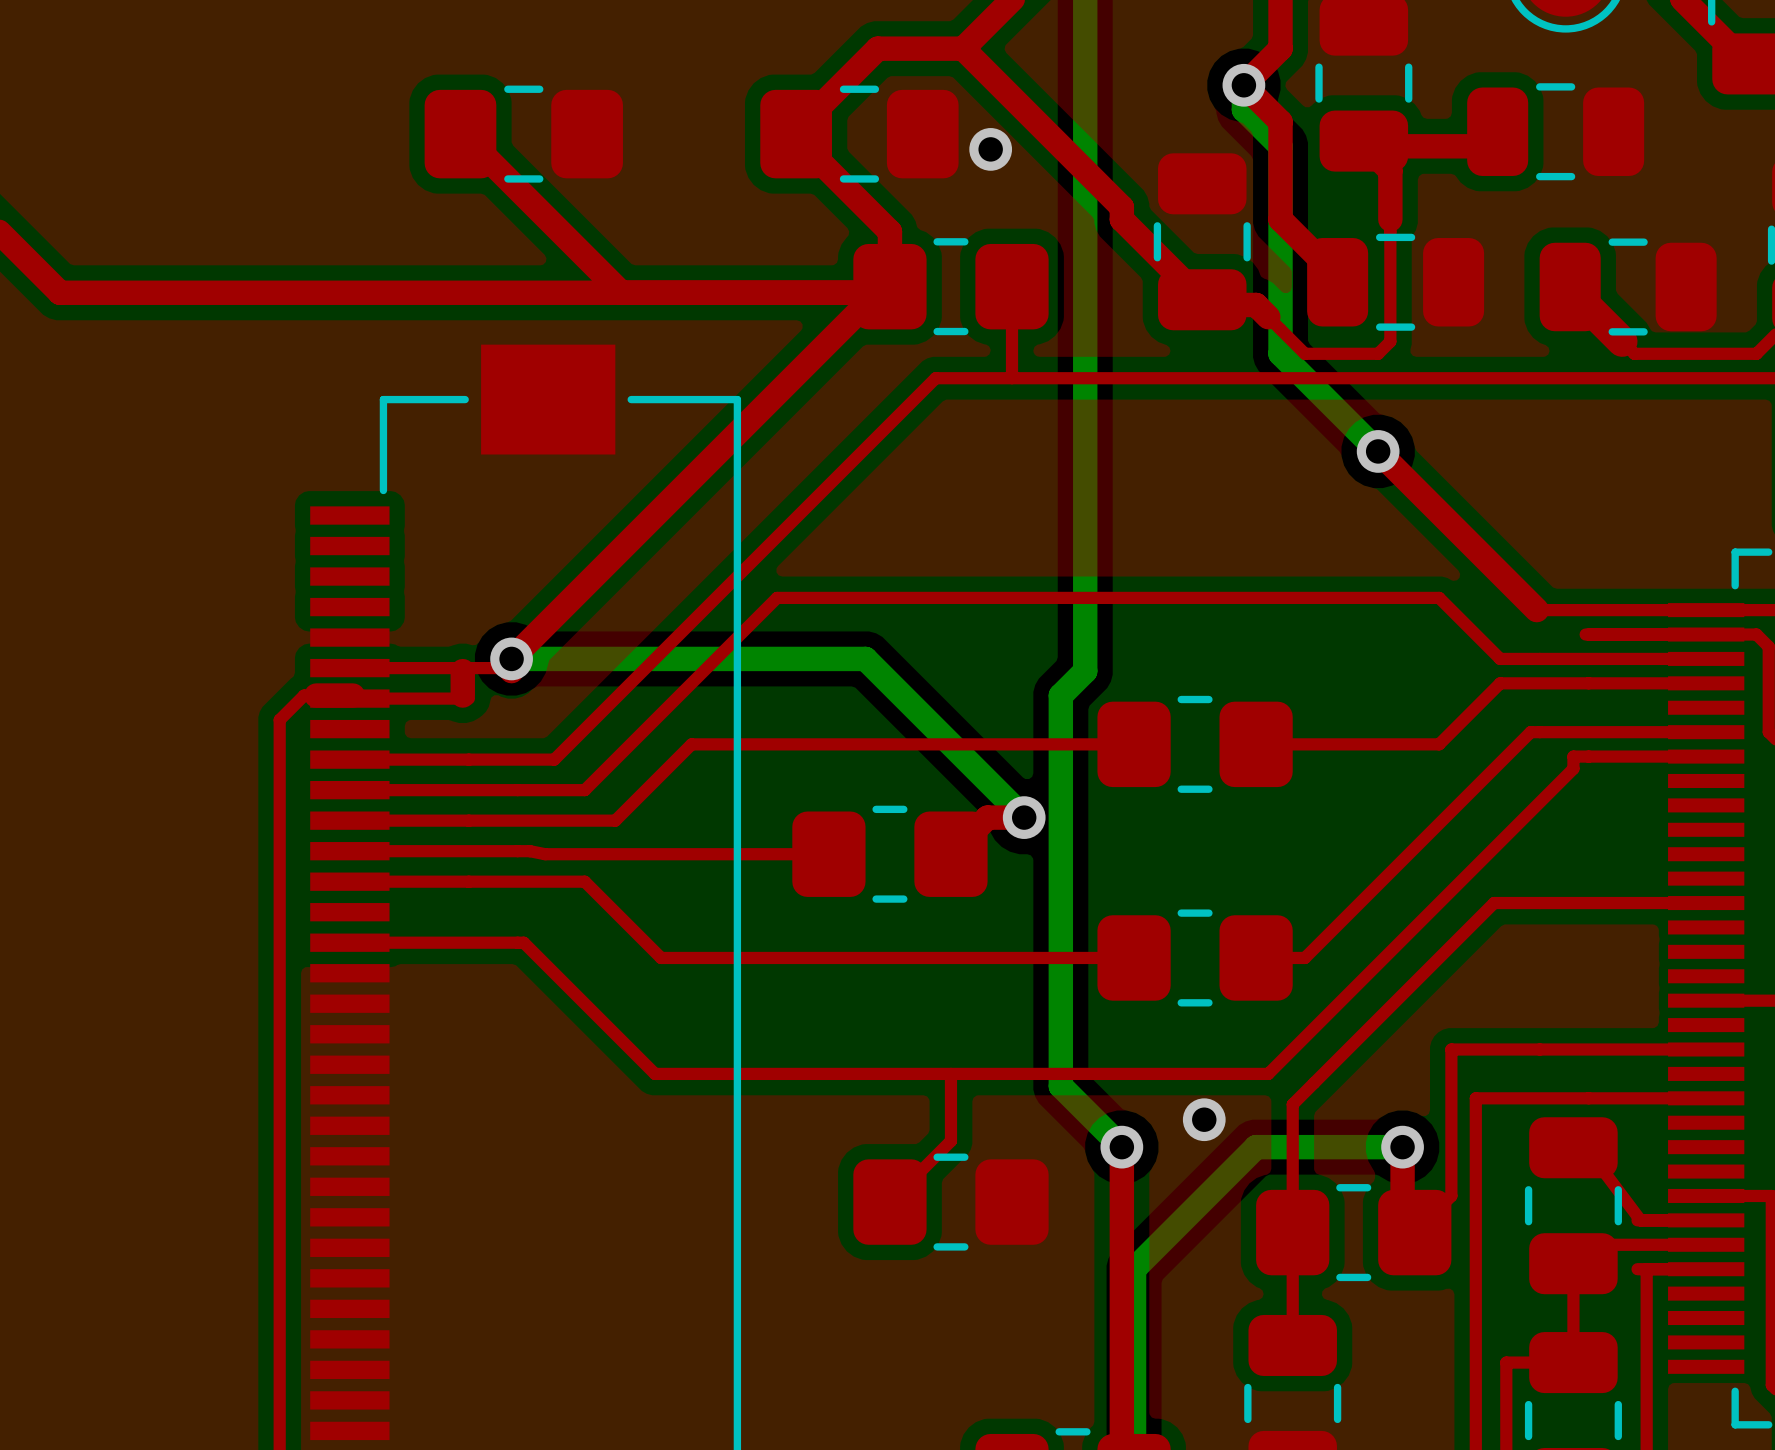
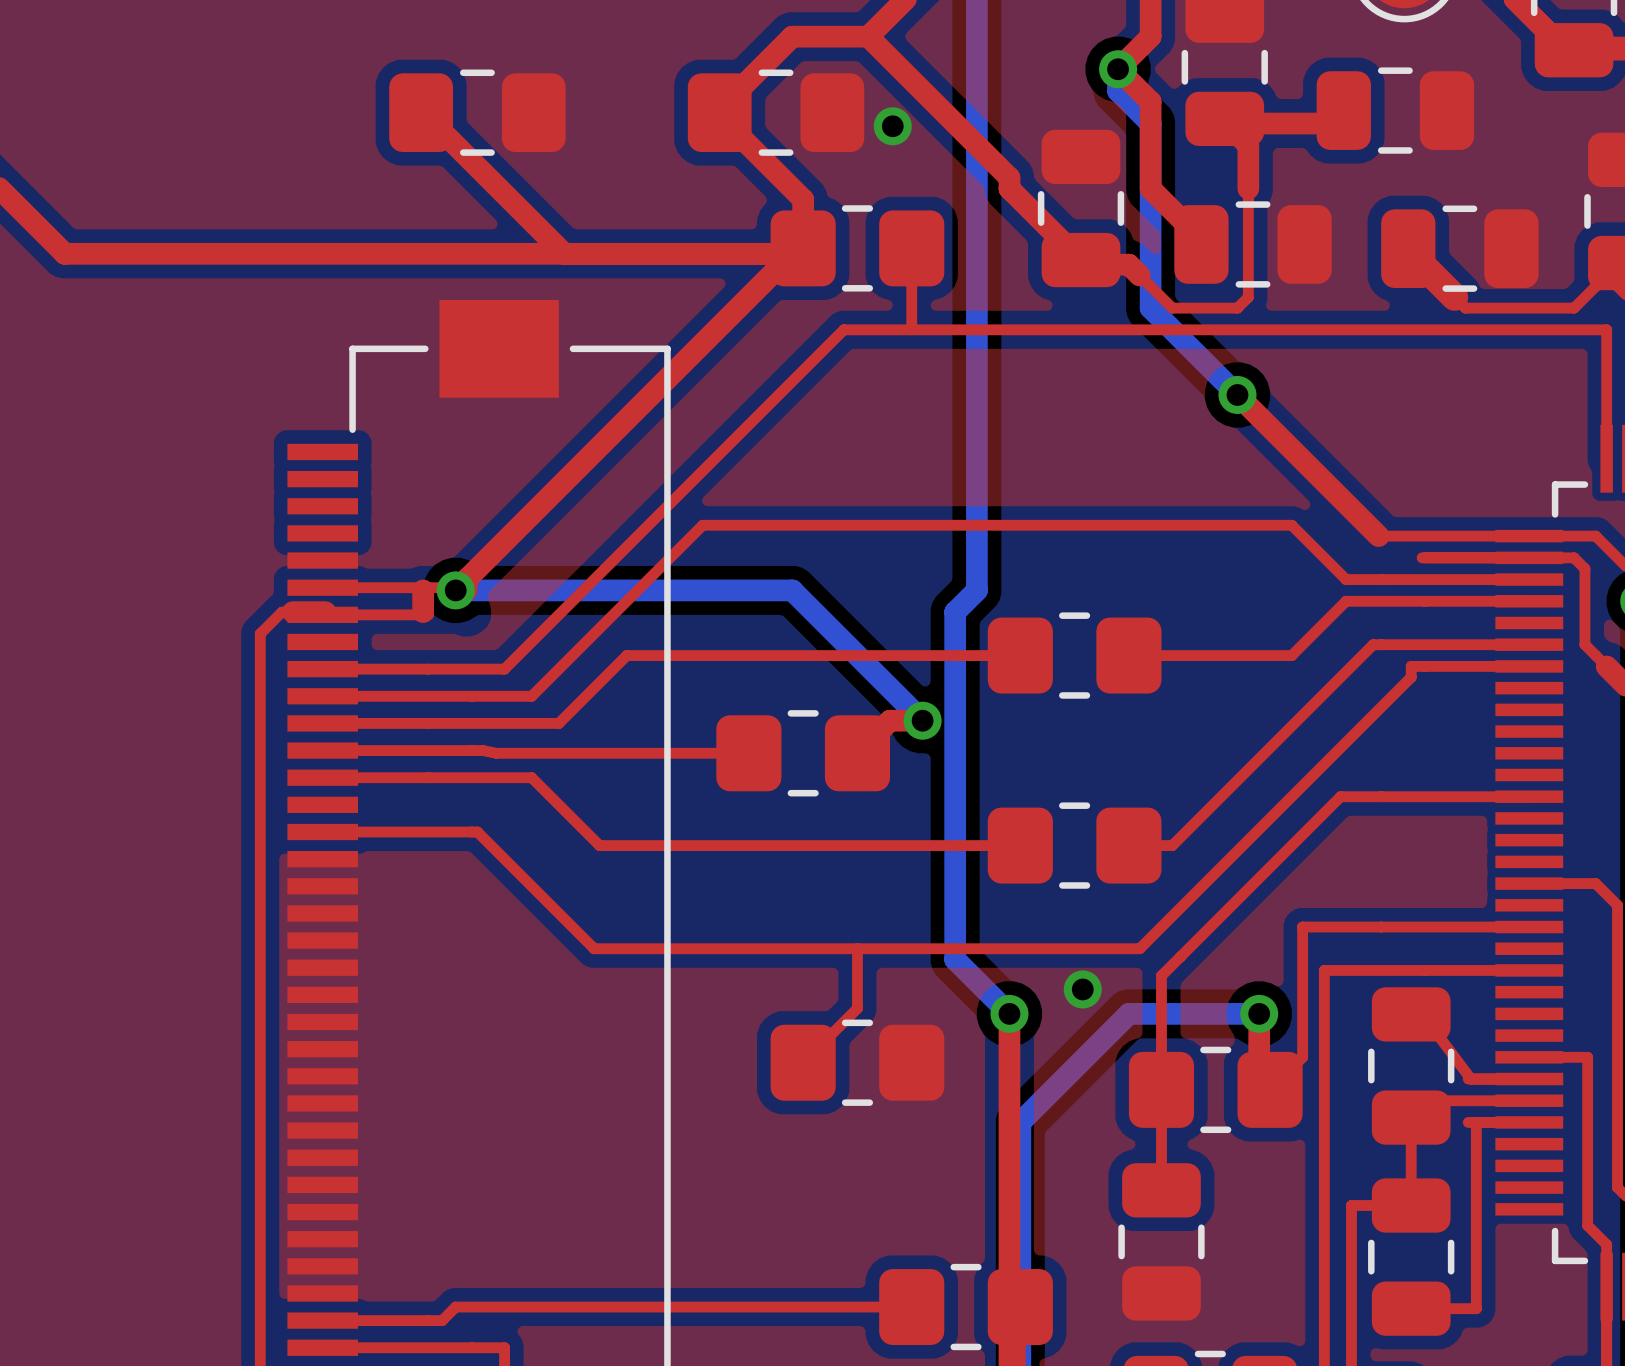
bottom track: (511, 658) (865, 658) (877, 671) -> (455, 590) (792, 590)
via position: (511, 658) -> (455, 590)

